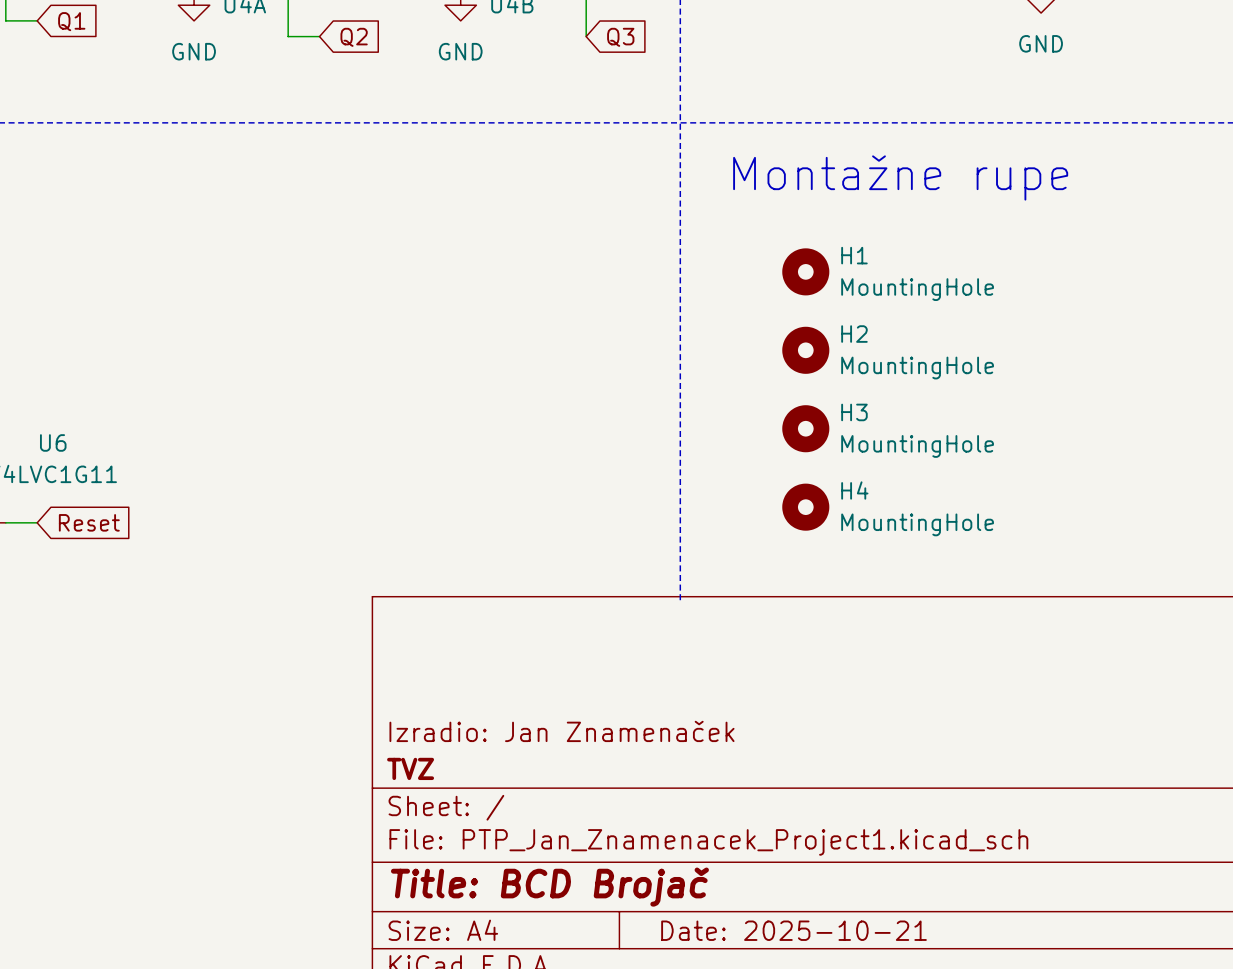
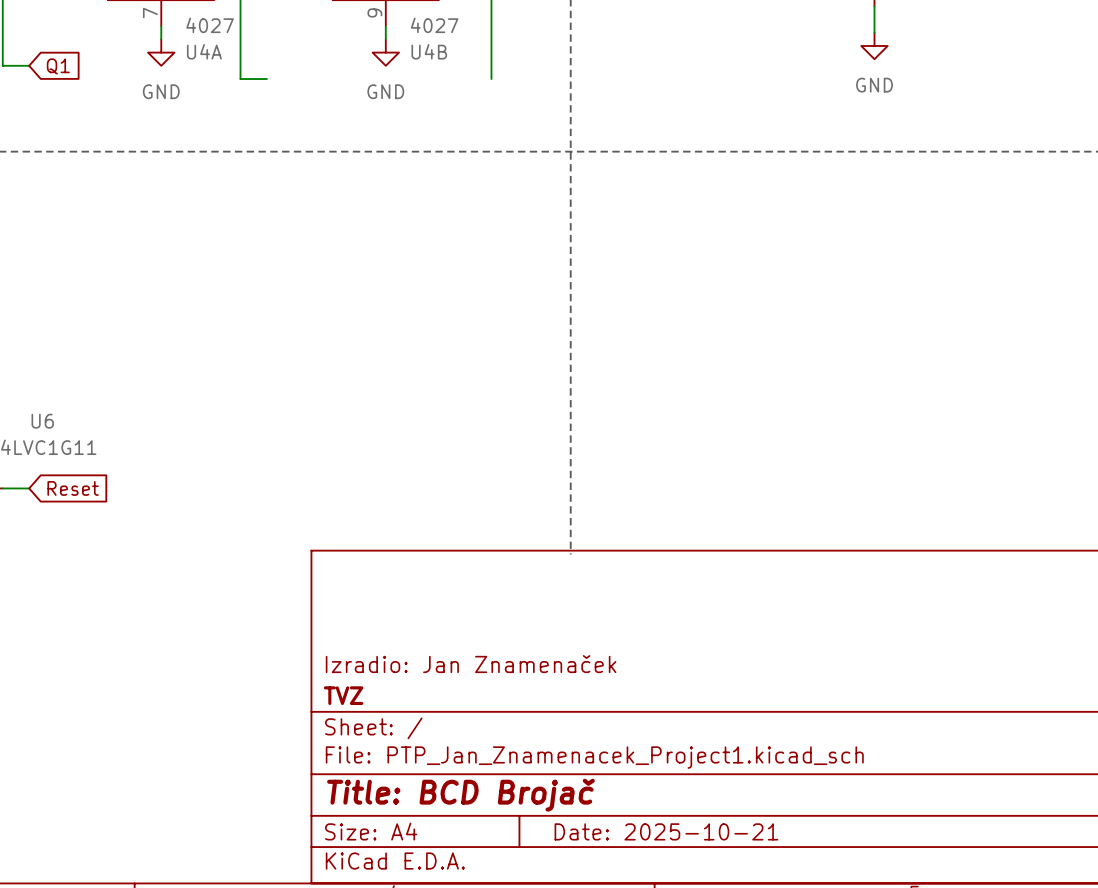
global label: Q2 (354, 37) -> none
global label: Q3 (620, 37) -> none
text: Montažne rupe (900, 177) -> none
H1: MountingHole (805, 271) -> none
H2: MountingHole (805, 350) -> none
H3: MountingHole (805, 428) -> none
H4: MountingHole (805, 507) -> none

